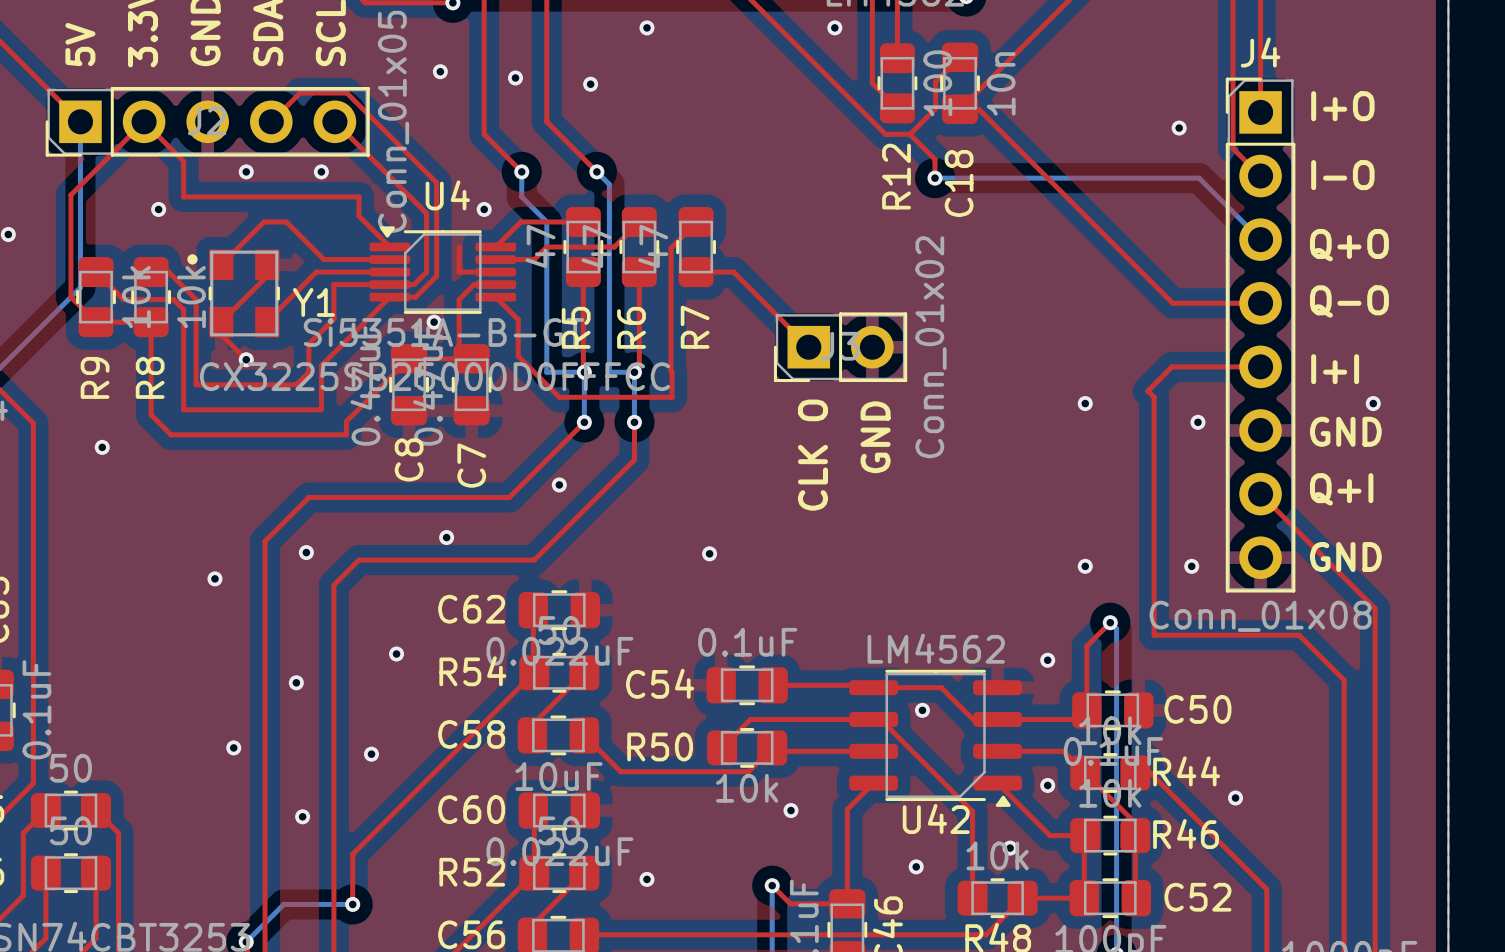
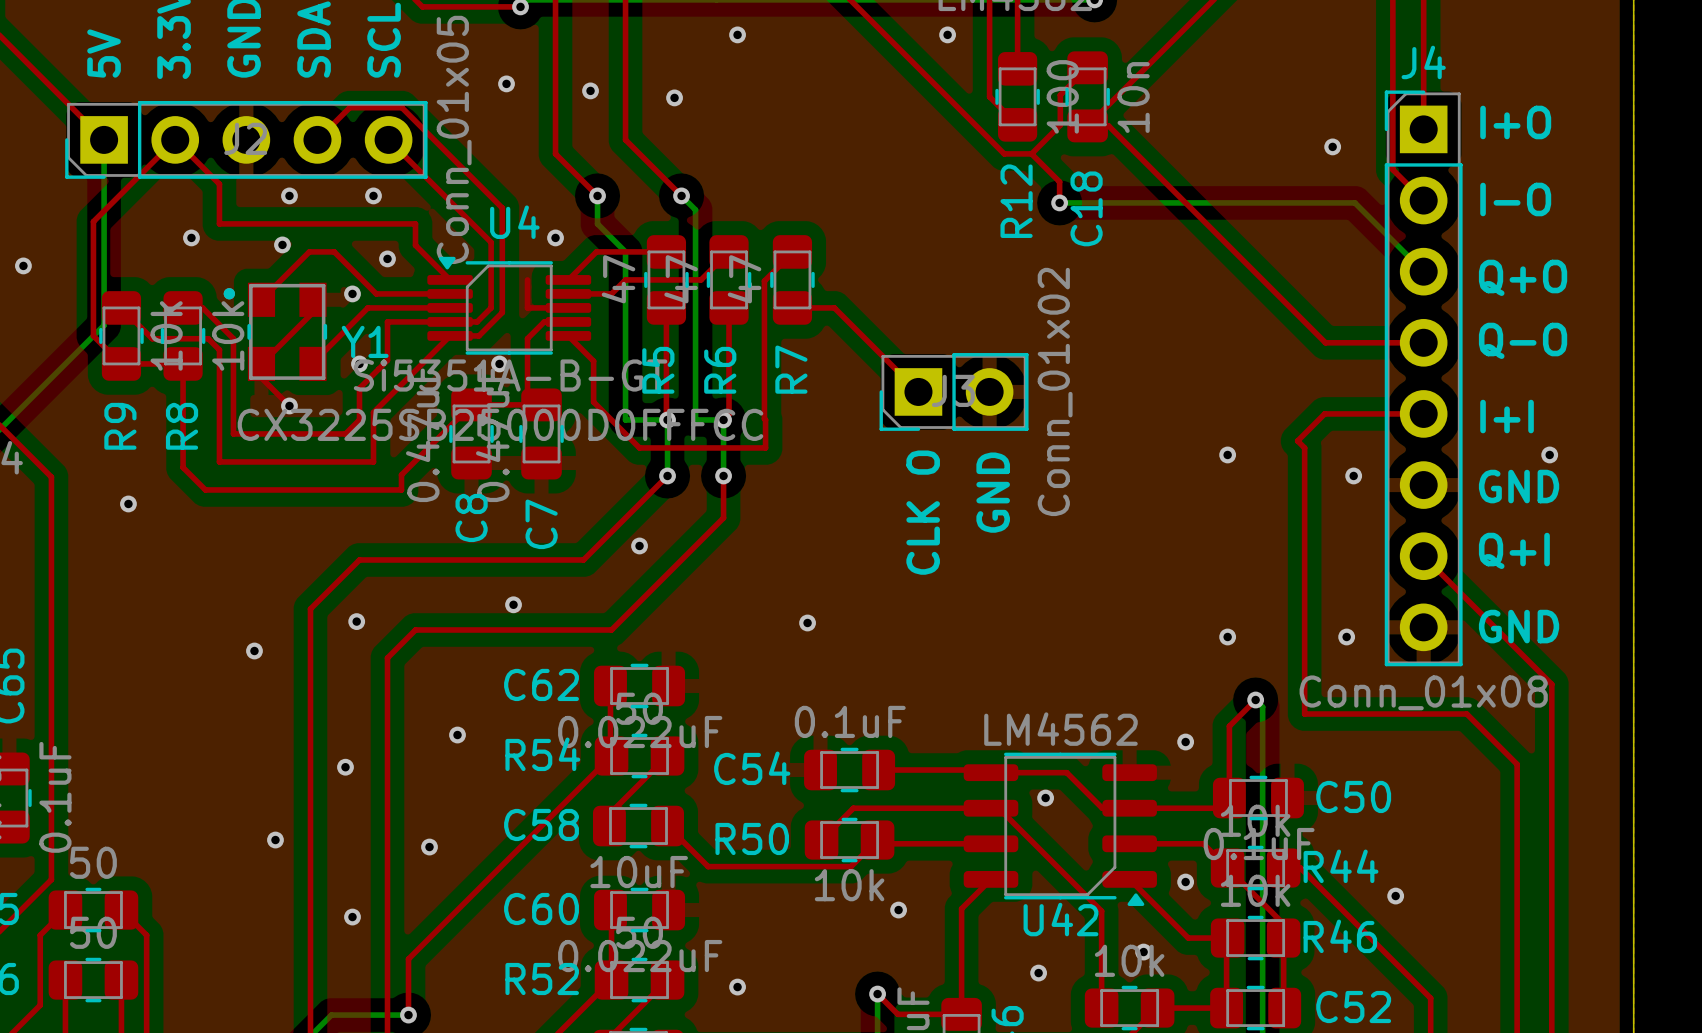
via: none -> (282, 244)
via: none -> (387, 258)
via: none -> (352, 293)
via: none -> (359, 363)

